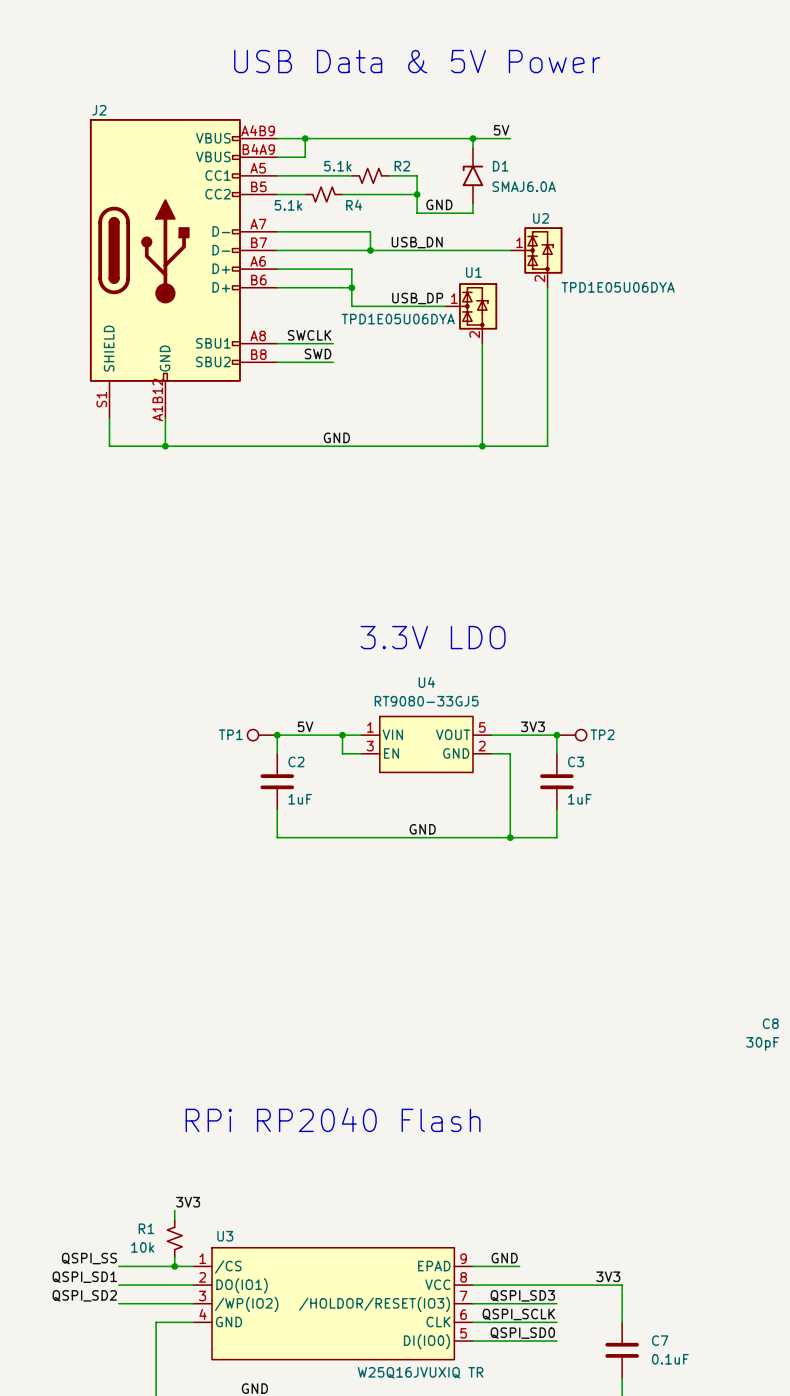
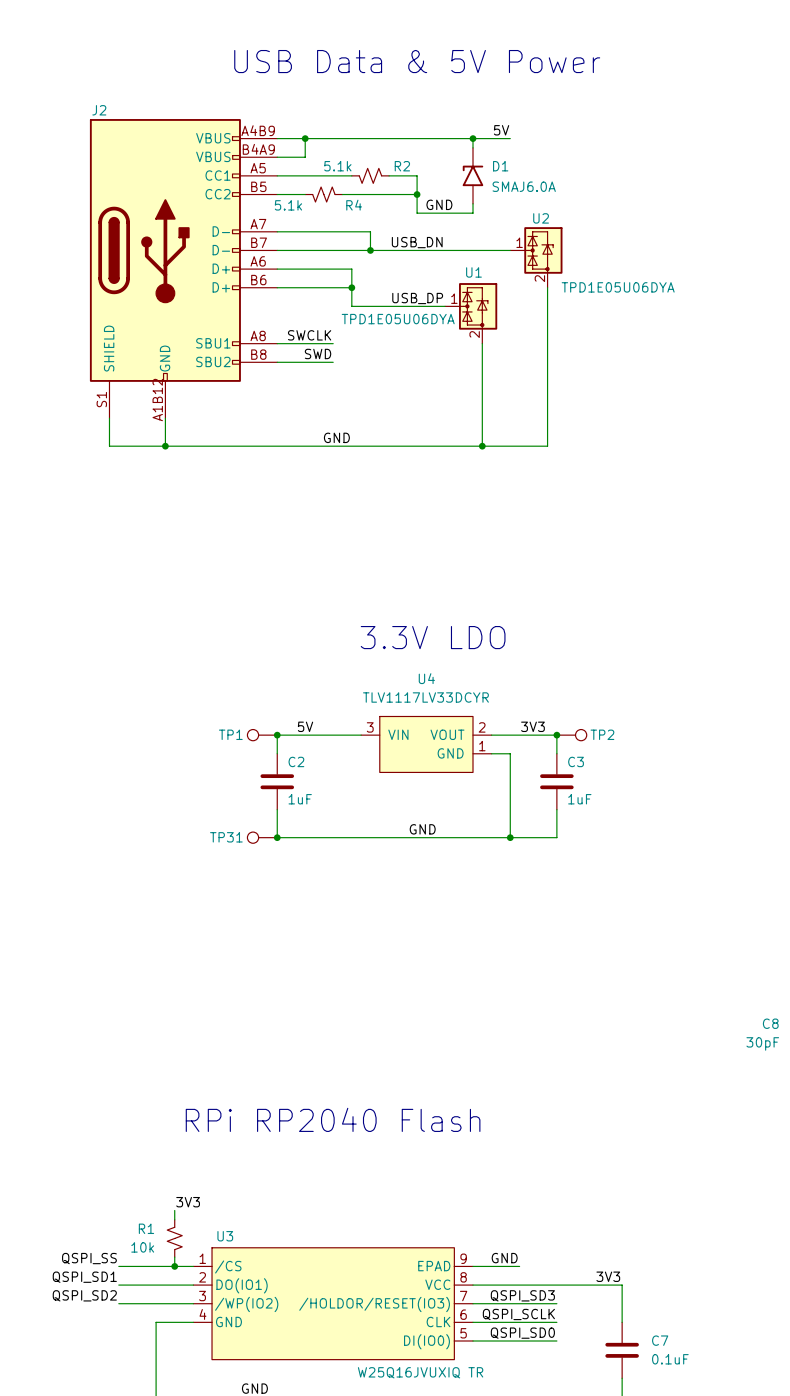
U4 value: RT9080-33GJ5 (426, 701) -> TLV1117LV33DCYR (425, 697)
U4 symbol: [361, 715, 492, 773] -> [361, 716, 492, 773]
wire: (342, 735) (342, 753) (361, 753) -> none
junction: (342, 735) -> none
TP31: none -> (262, 837)
junction: none -> (277, 837)

